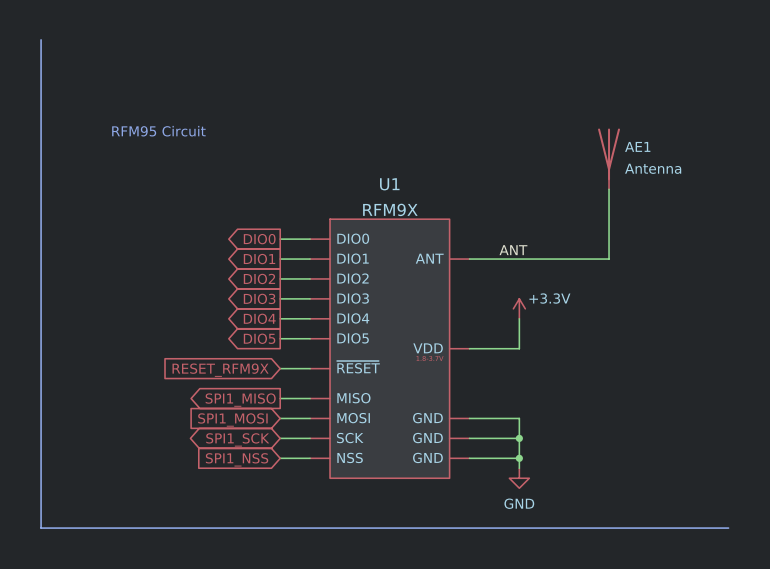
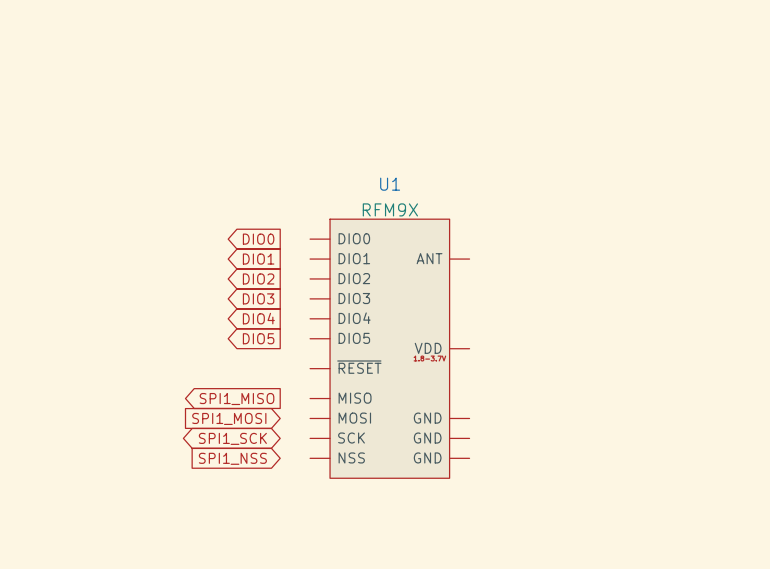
line: (41, 39) (41, 528) (728, 528) -> none
text: RFM95 Circuit (158, 131) -> none
AE1: Antenna (609, 158) -> none
wire: (609, 189) (609, 259) (469, 259) -> none
wire: (280, 239) (310, 239) -> none
label: ANT (513, 250) -> none
wire: (280, 259) (310, 259) -> none
wire: (280, 278) (310, 278) -> none
wire: (280, 298) (310, 298) -> none
power symbol: +3.3V (519, 308) -> none
wire: (280, 318) (310, 318) -> none
wire: (519, 318) (519, 348) (469, 348) -> none
wire: (280, 338) (310, 338) -> none
wire: (280, 368) (310, 368) -> none
global label: RESET_RFM9X (220, 370) -> none
wire: (280, 398) (310, 398) -> none
wire: (280, 418) (310, 418) -> none
wire: (469, 418) (519, 418) (519, 468) -> none
wire: (280, 438) (310, 438) -> none
wire: (469, 438) (519, 438) -> none
junction: (519, 438) -> none
wire: (280, 458) (310, 458) -> none
wire: (469, 458) (519, 458) -> none
junction: (519, 458) -> none
power symbol: GND (519, 478) -> none

